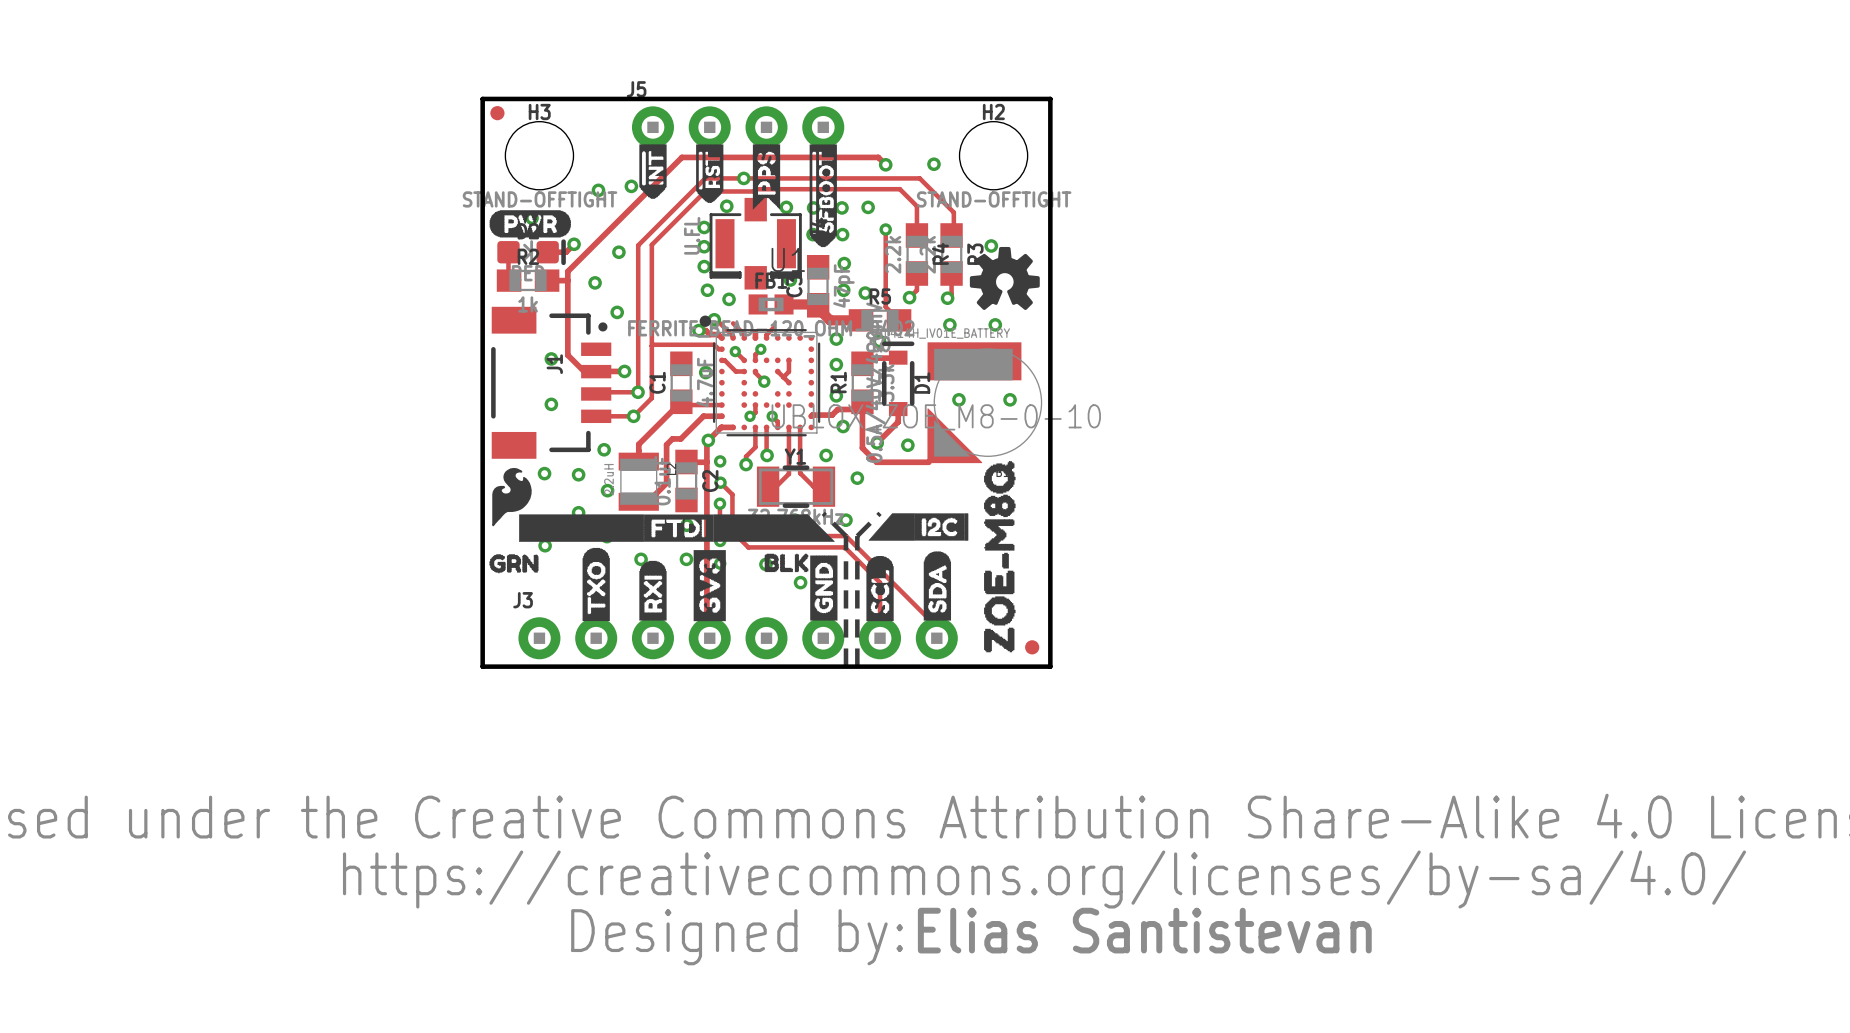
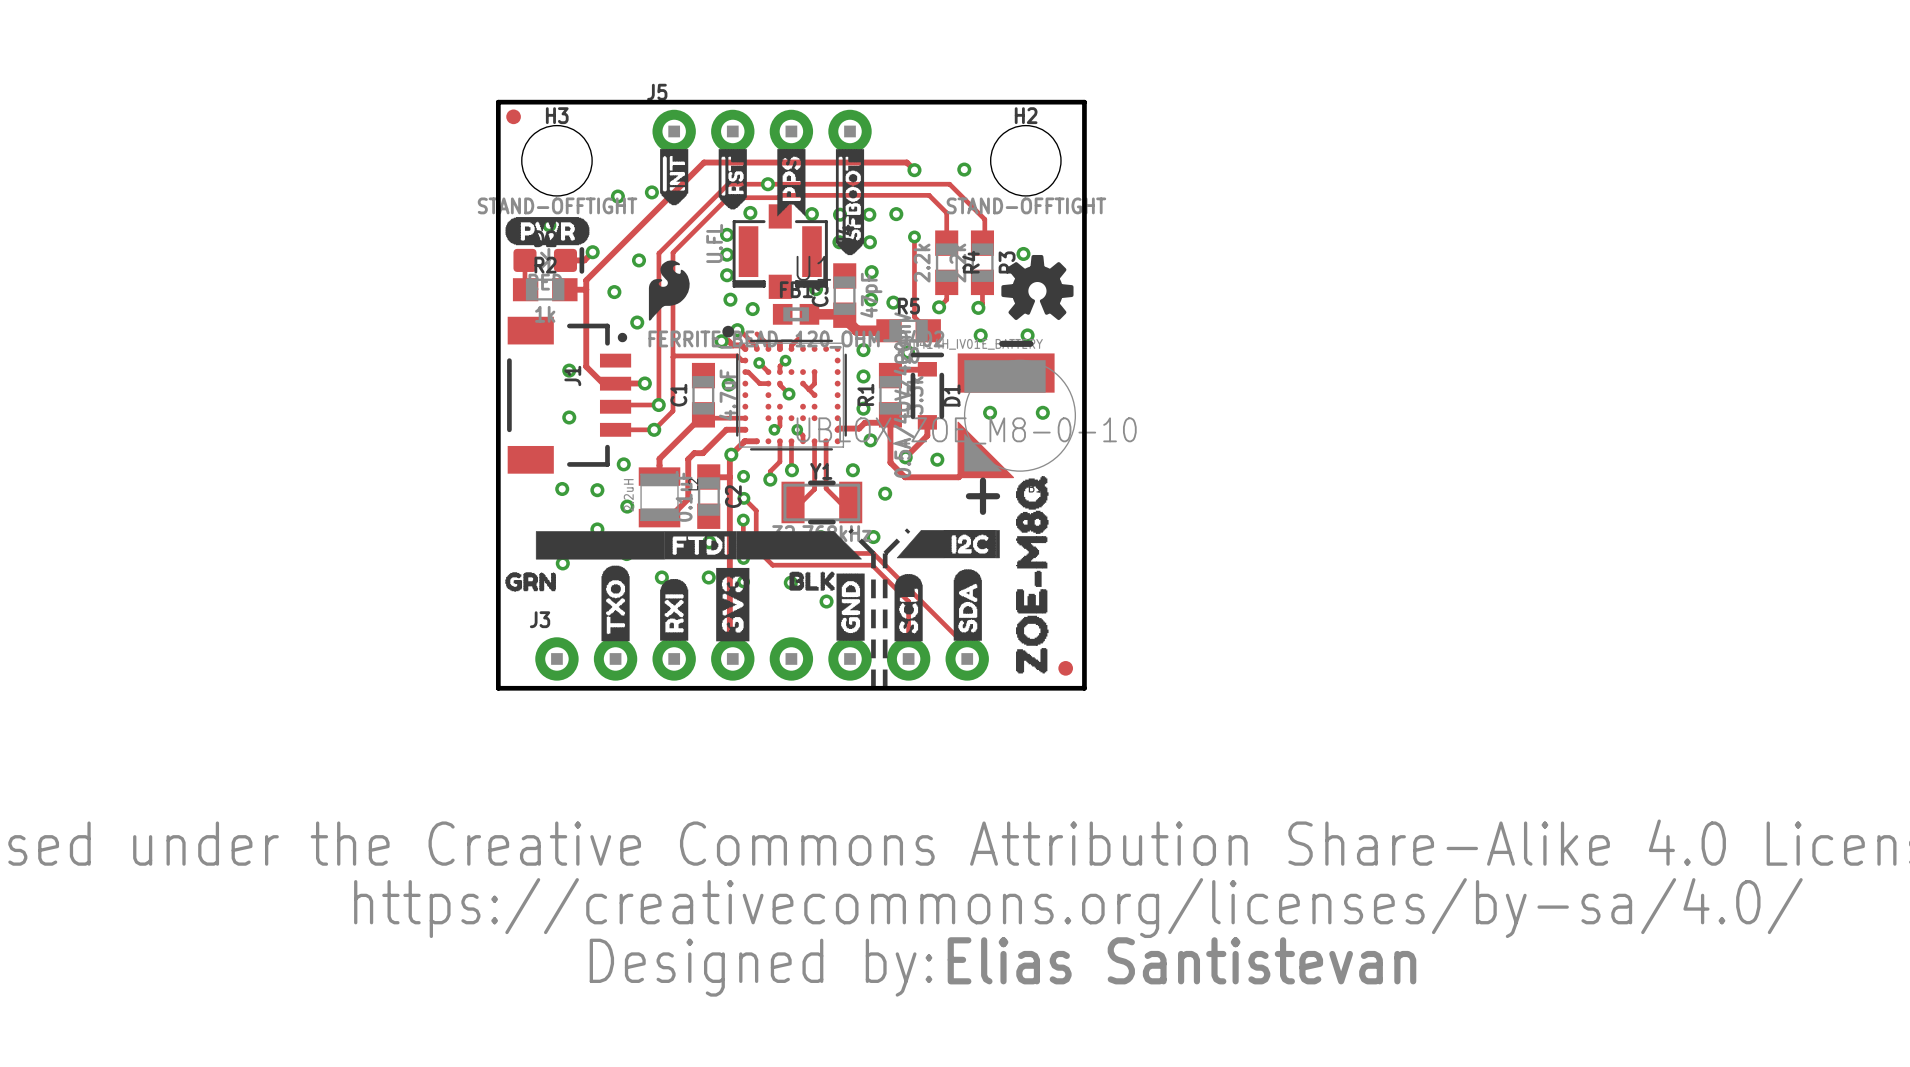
text: none -> - (1016, 343)
text: none -> + (982, 496)
drawing position: (511, 497) -> (669, 290)

